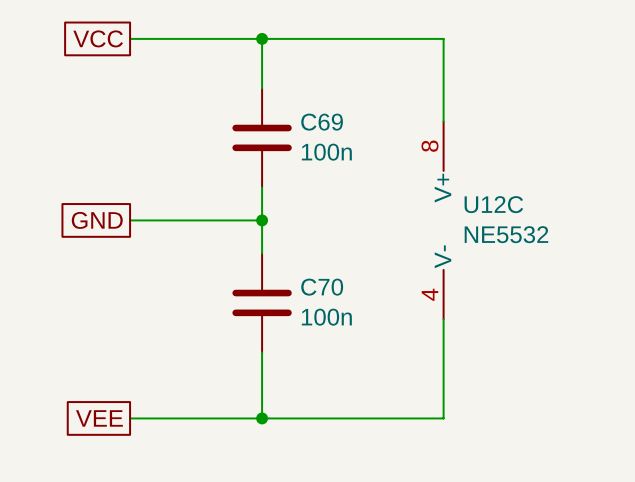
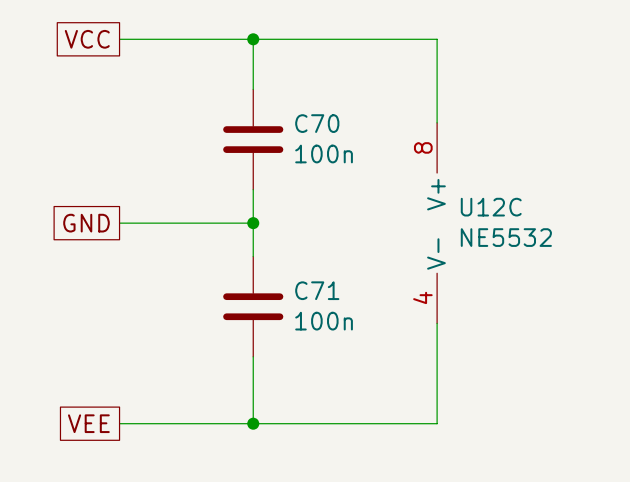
C69 name: C69 (322, 122) -> C70 (317, 123)
C70 name: C70 (322, 287) -> C71 (317, 290)

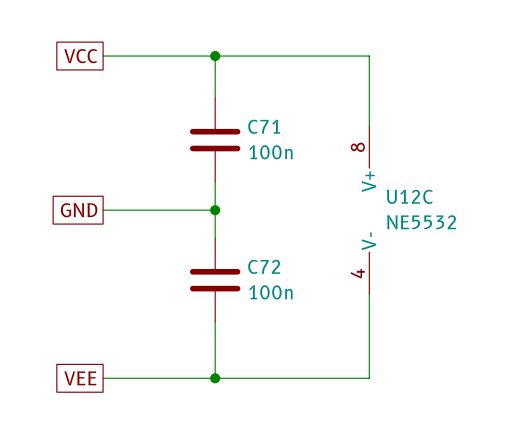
C70 name: C70 (317, 123) -> C71 (264, 126)
C71 name: C71 (317, 290) -> C72 (264, 266)

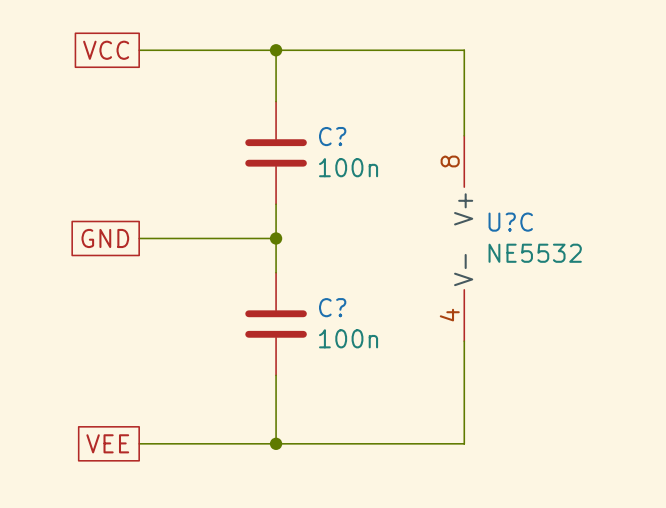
C71 name: C71 (264, 126) -> C? (332, 136)
U12C name: U12C (409, 196) -> U?C (510, 222)
C72 name: C72 (264, 266) -> C? (332, 307)

